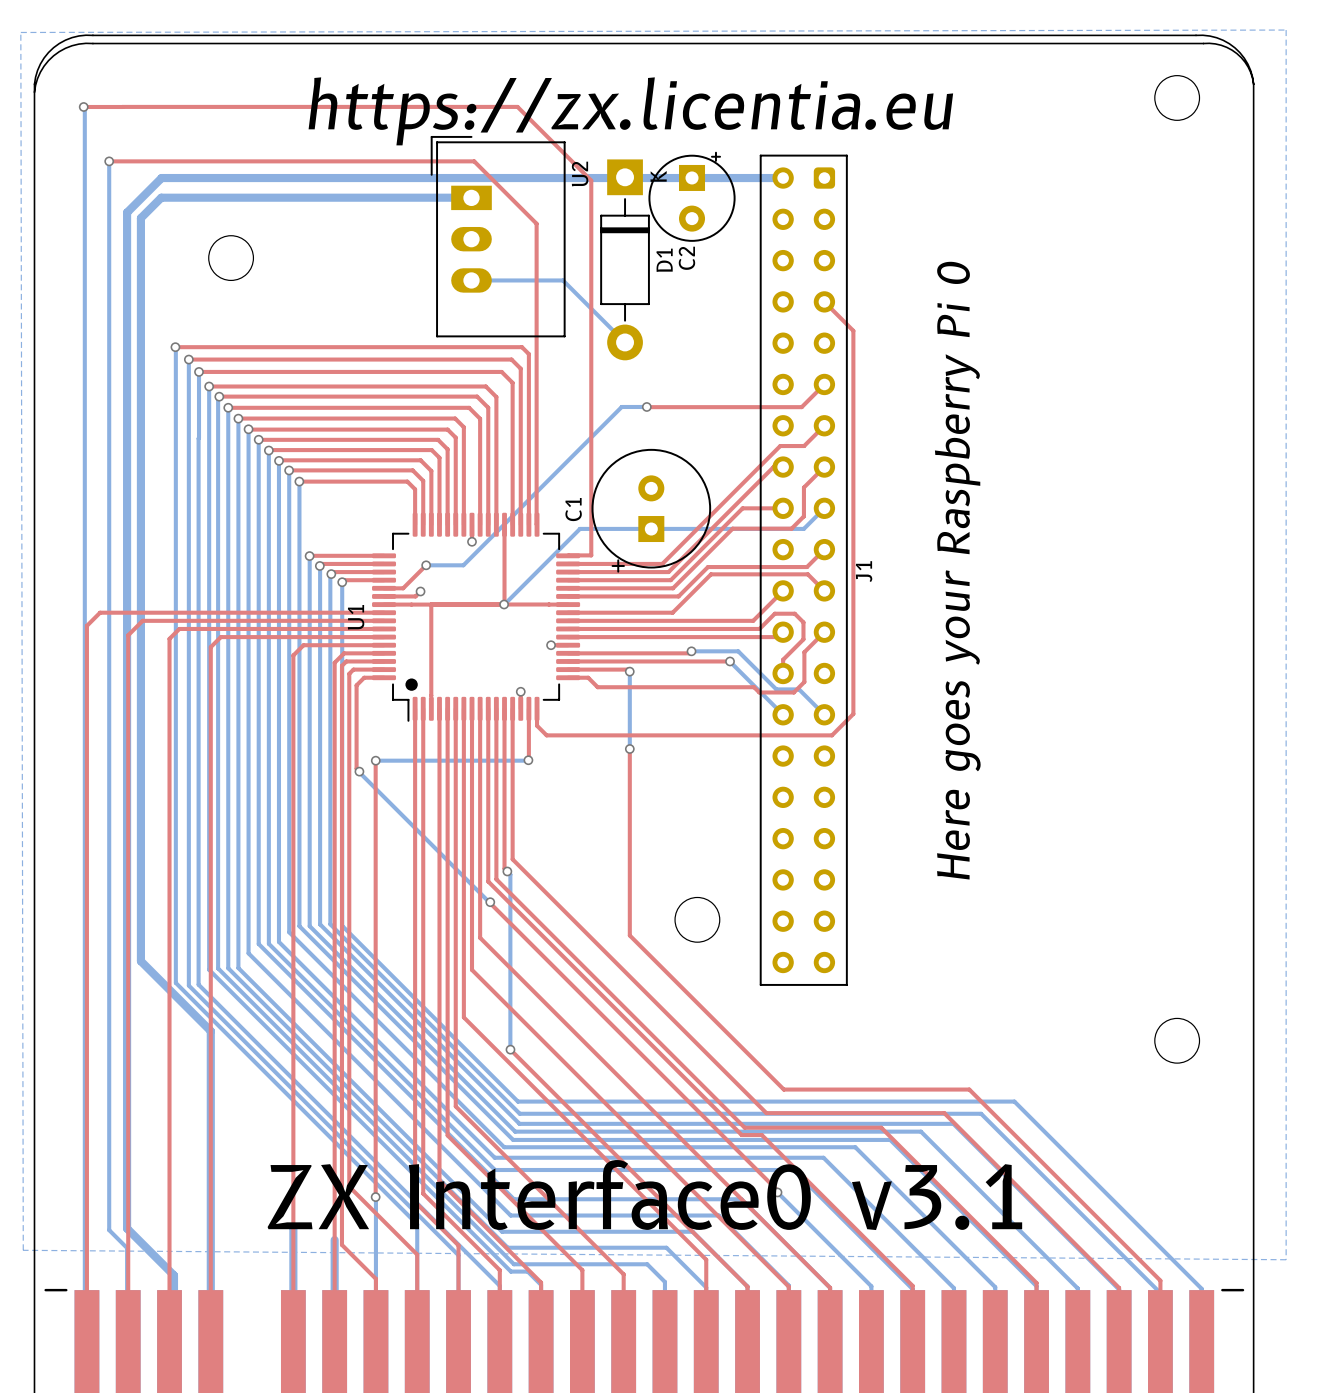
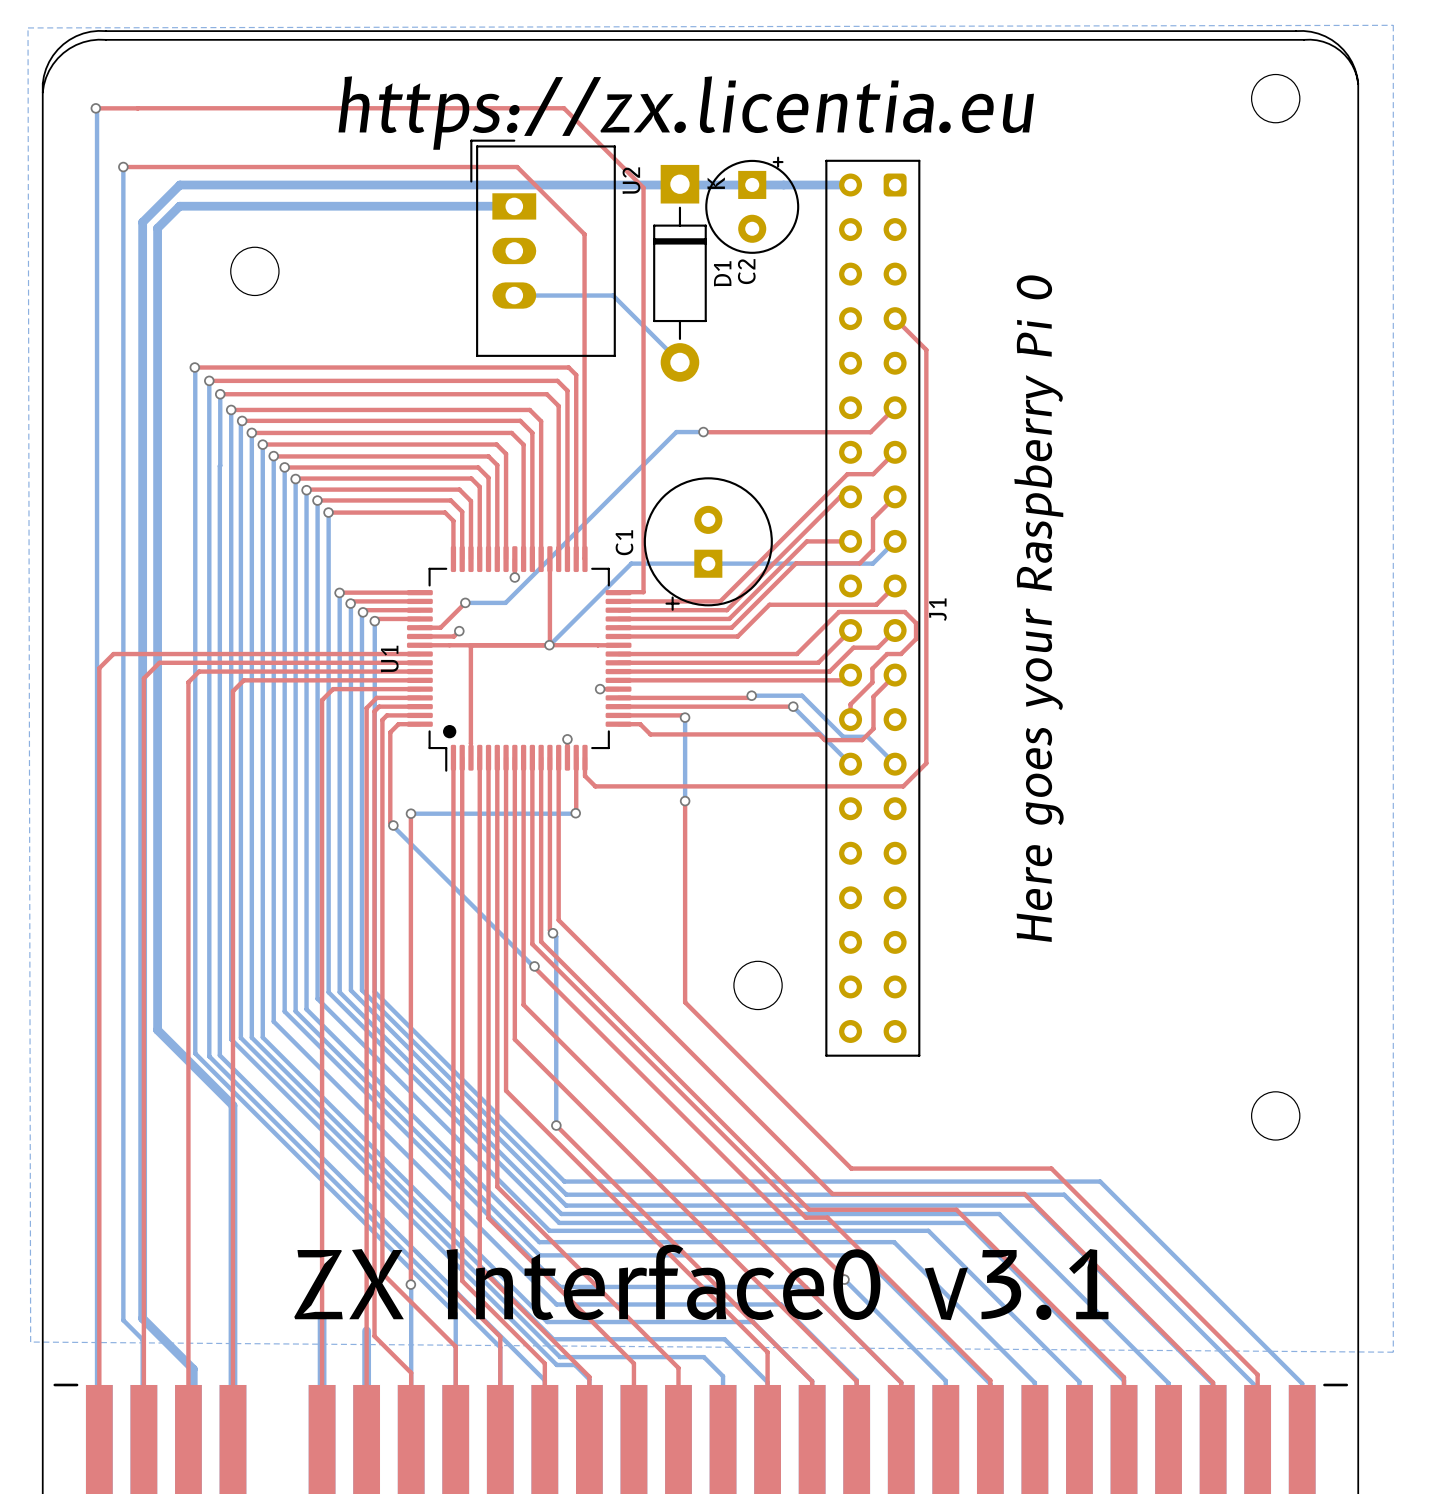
top track: (824, 590) (807, 574) (711, 574) (672, 612) -> (850, 704) (872, 682) (872, 668) (887, 654) (901, 654) (916, 639) (916, 623) (904, 611) (839, 611) (796, 654) (731, 654)
top track: (759, 628) (774, 613) (794, 613) (803, 622) (803, 639) (783, 659) -> (825, 671) (829, 671) (853, 647) (877, 647) (895, 630)

